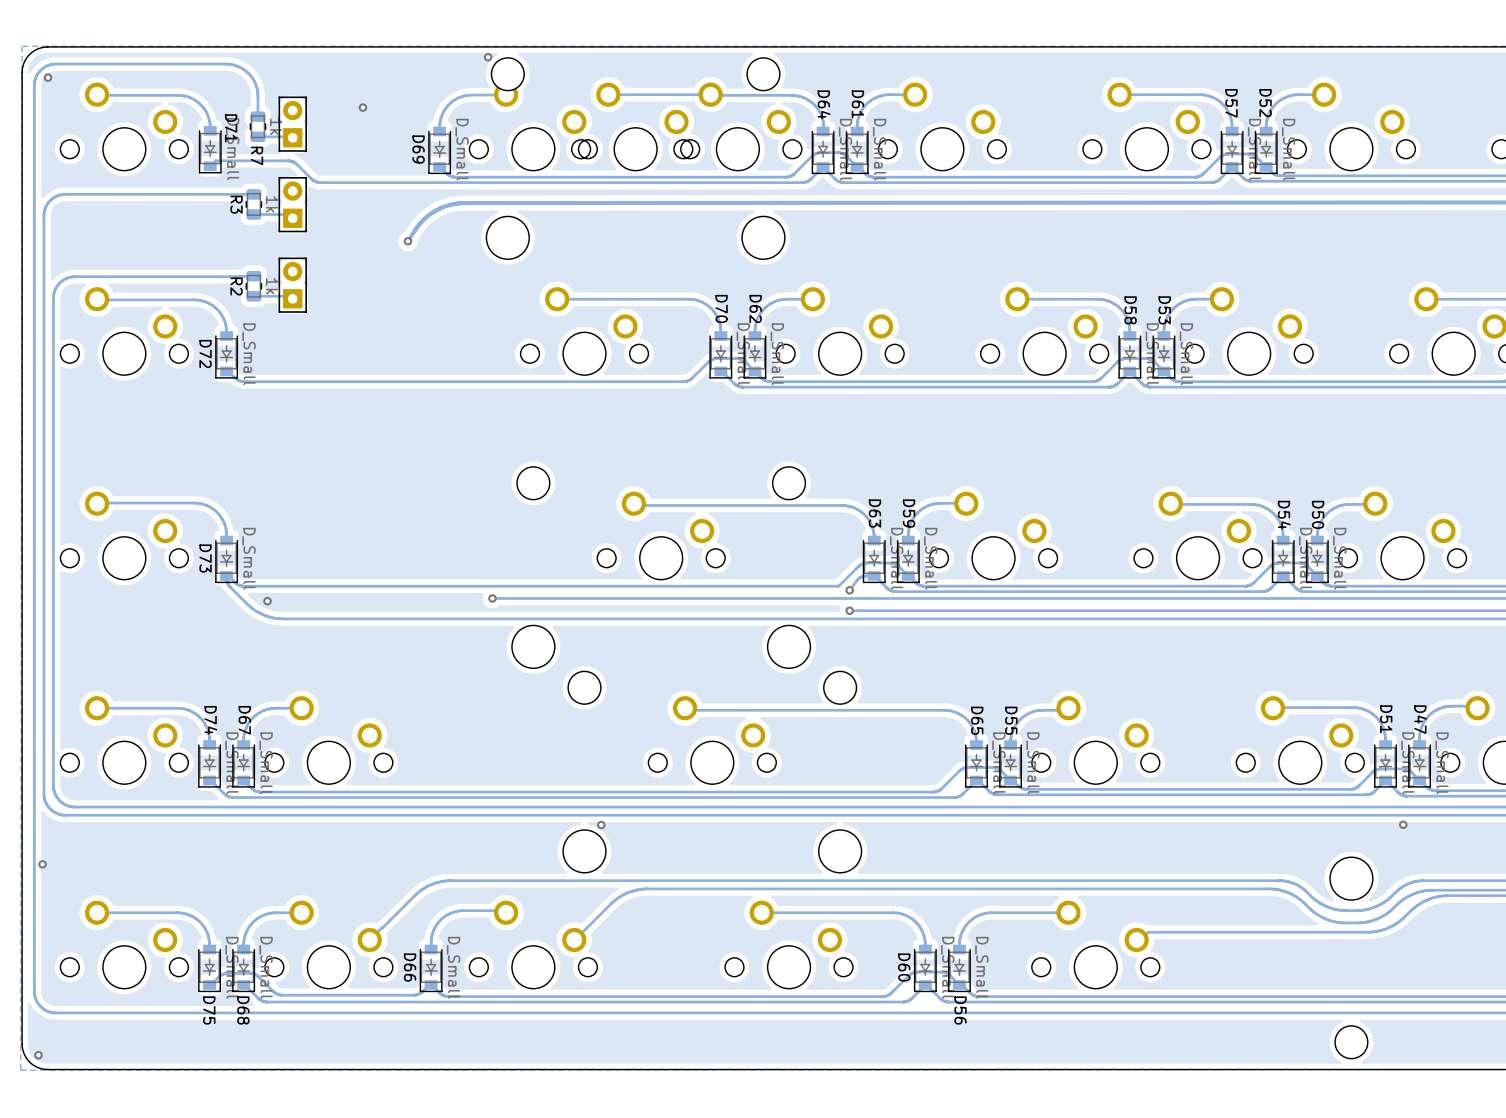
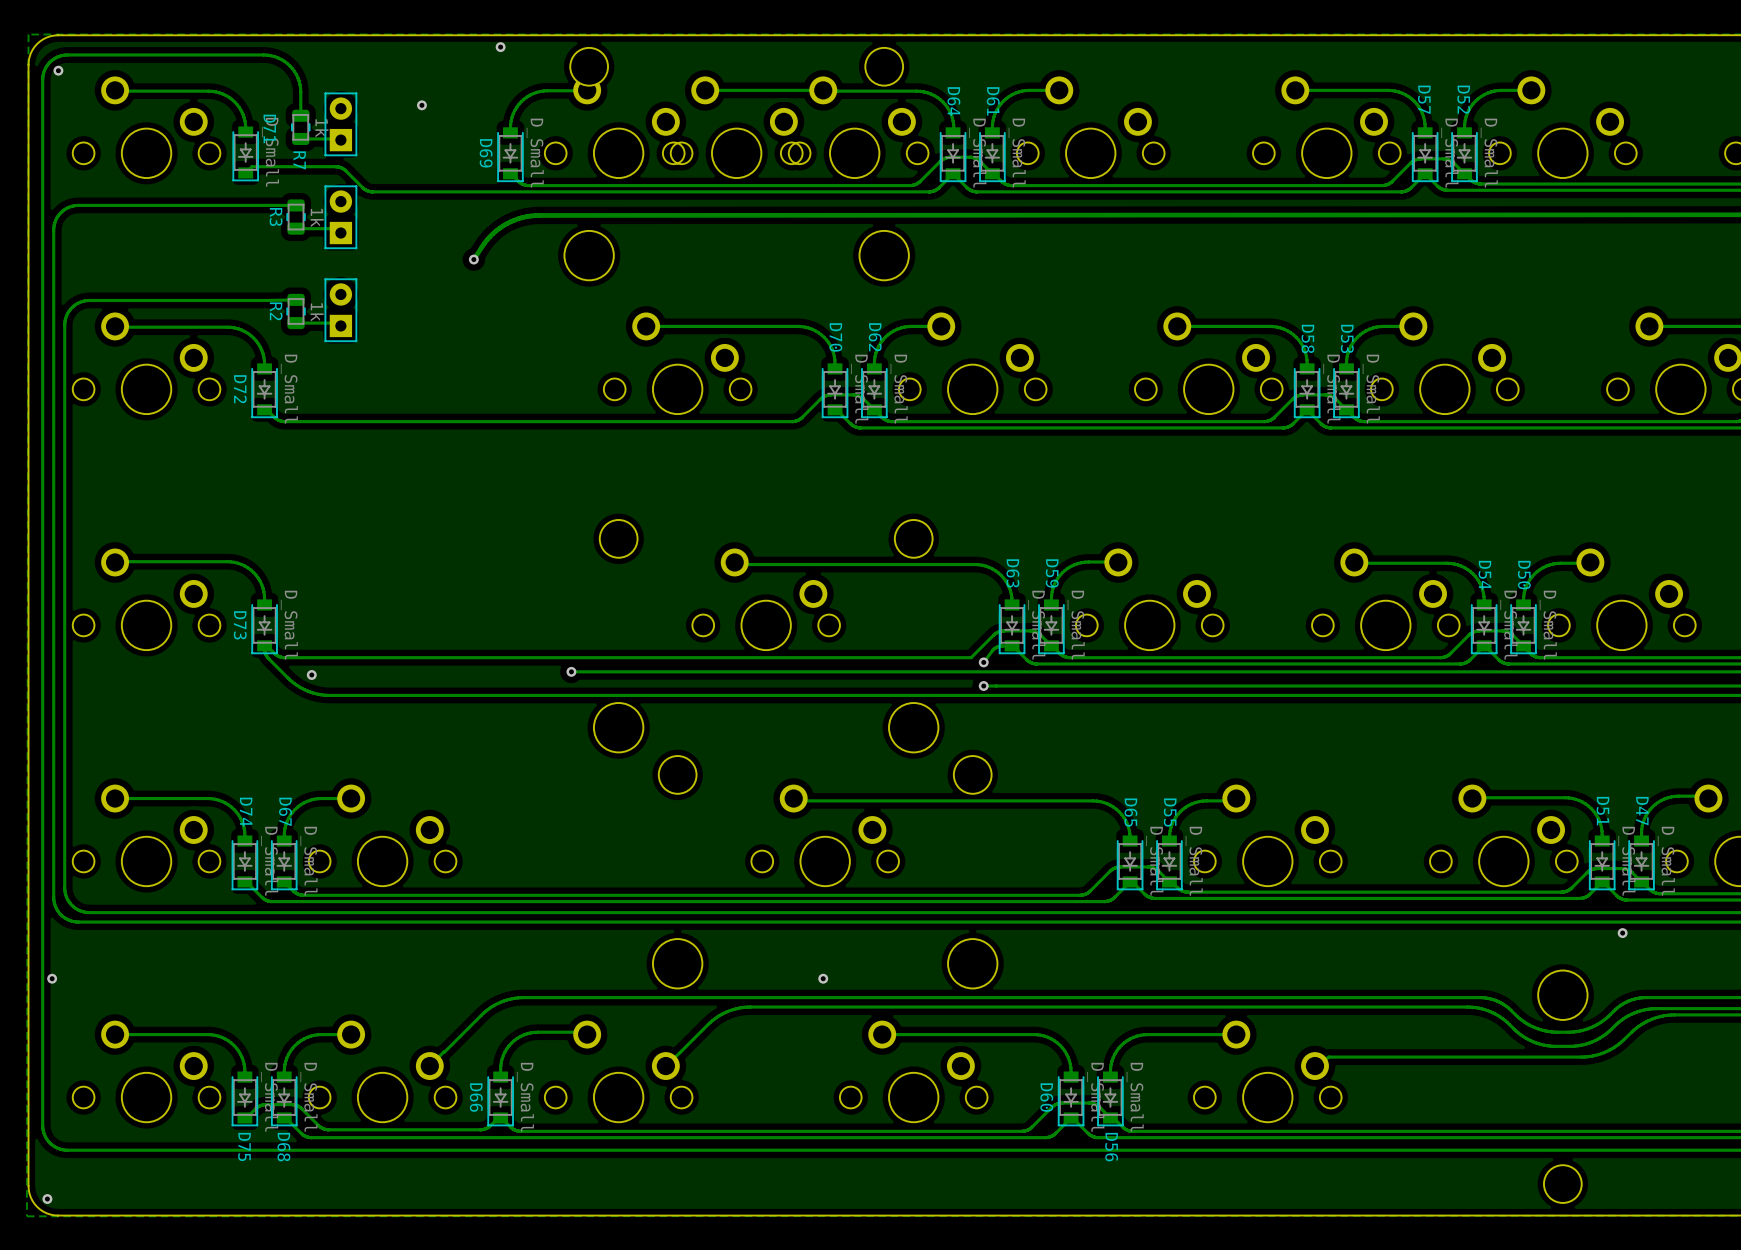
via position: (488, 57) -> (500, 47)
via: (601, 825) -> none
via: none -> (823, 978)

